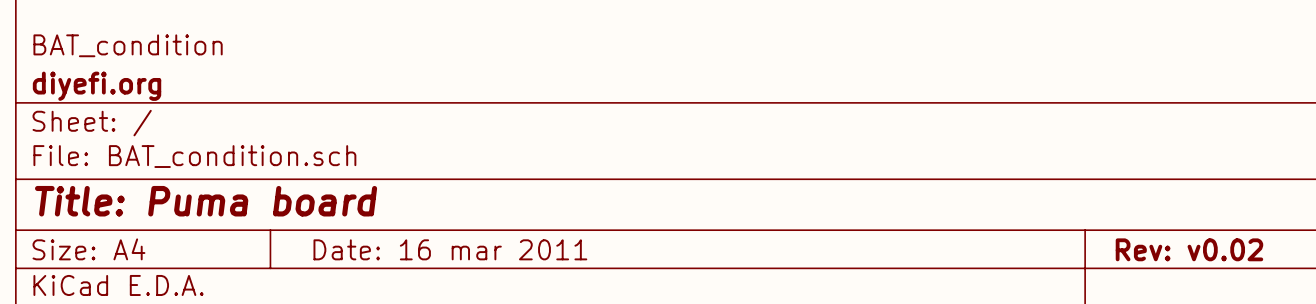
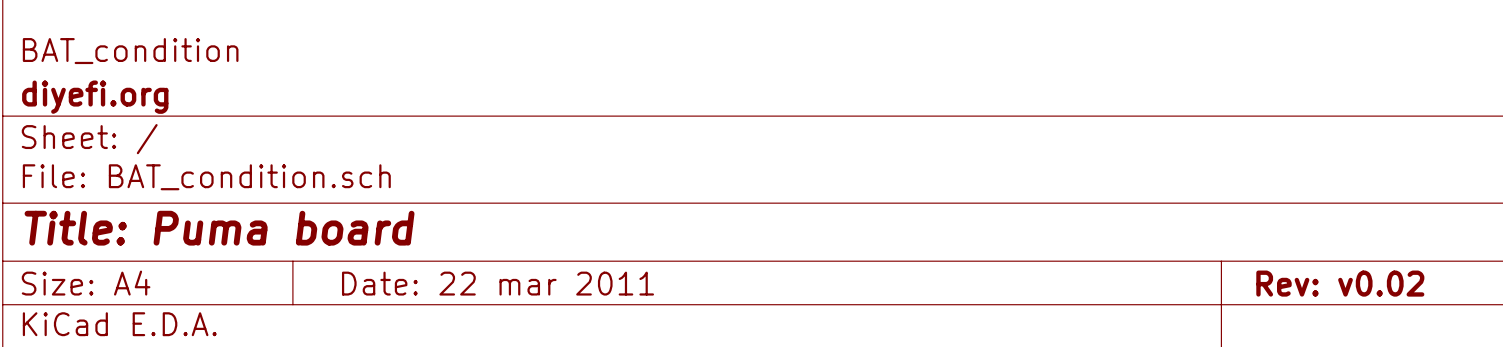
title block: Date: 16 mar 2011 (450, 249) -> Date: 22 mar 2011 (498, 283)

